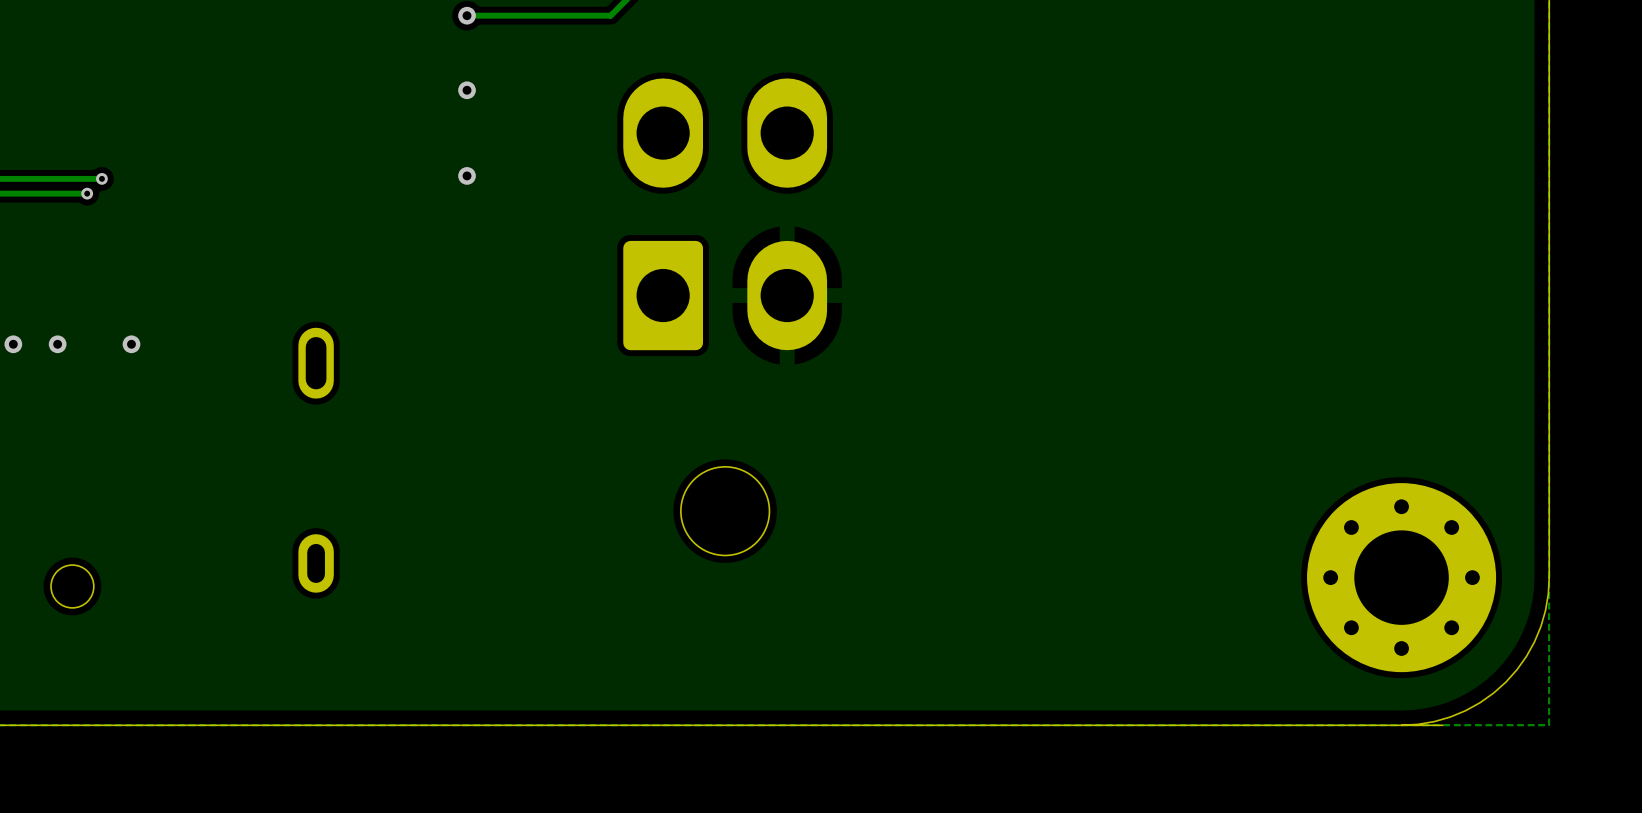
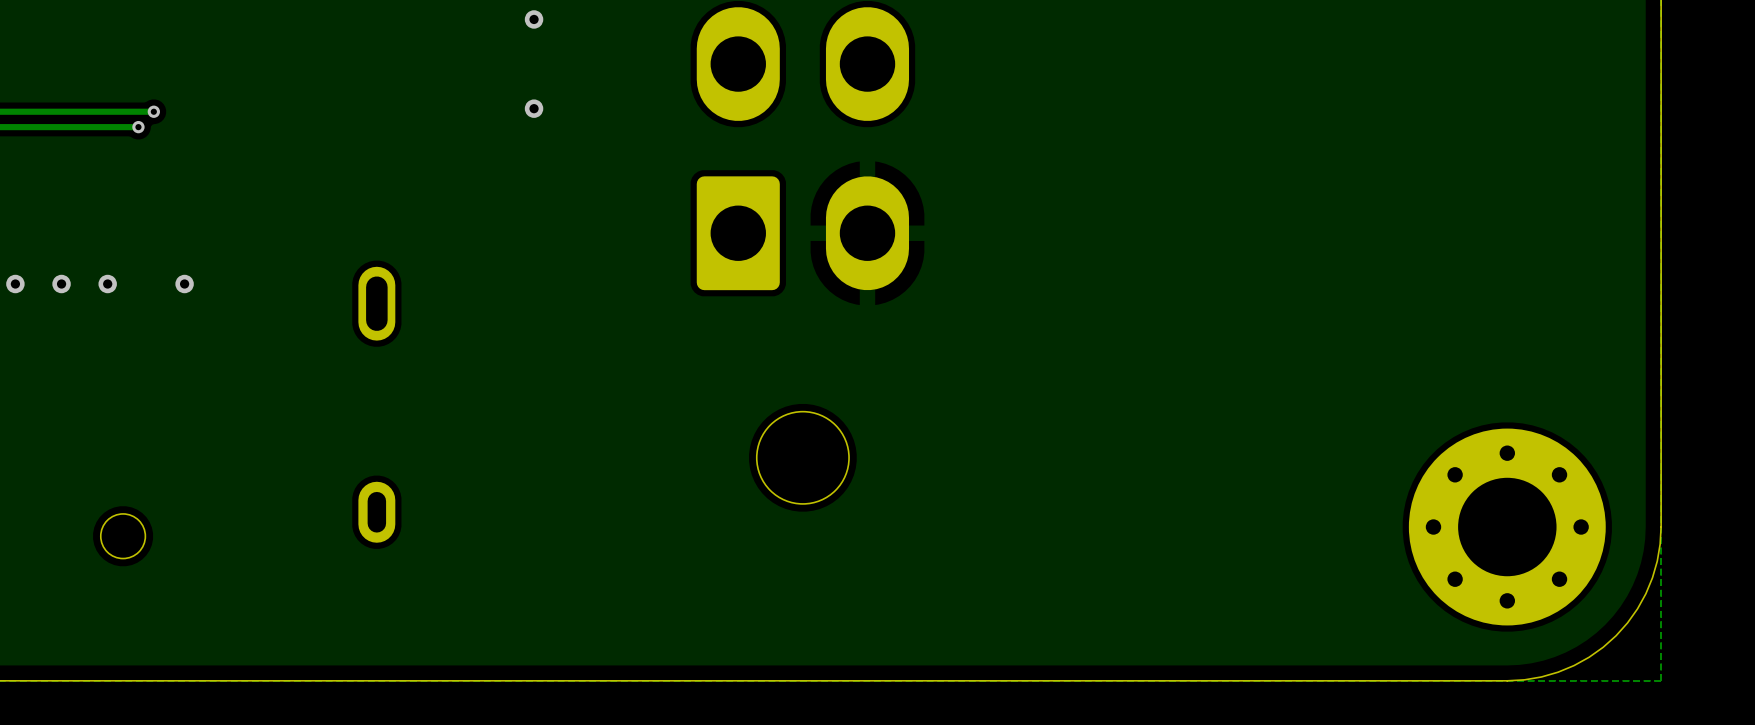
board edge: (1442, 725) (1401, 725) -> none

